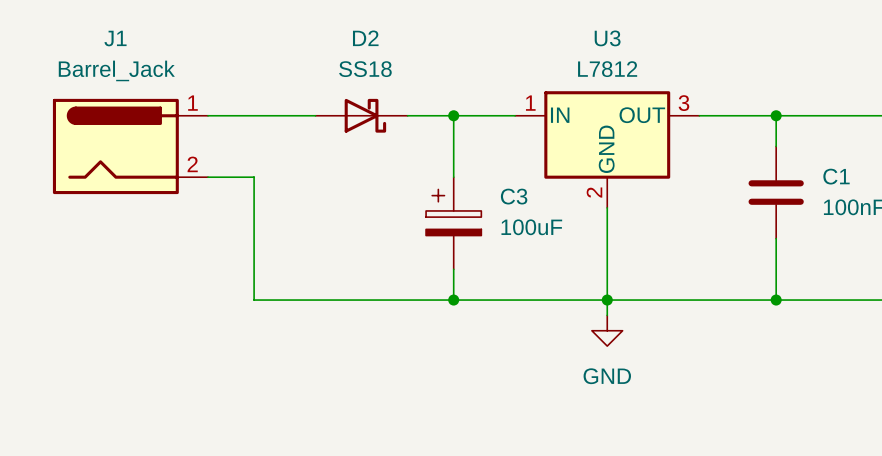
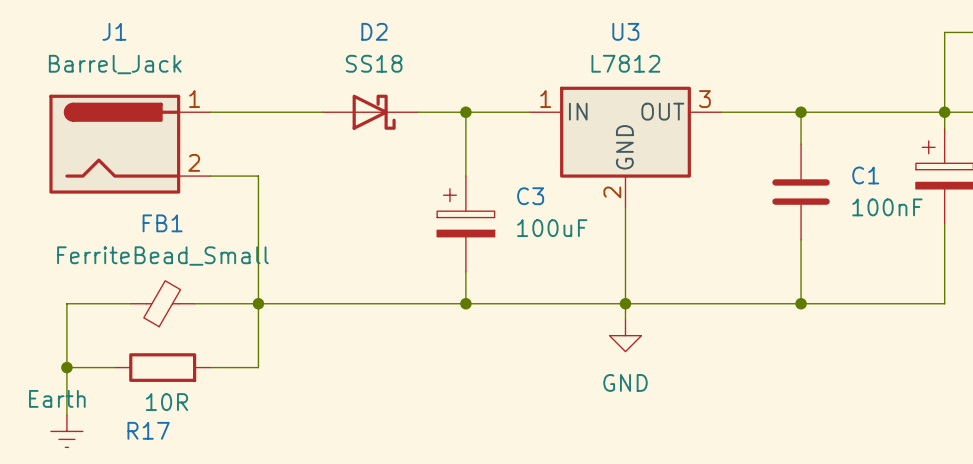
wire: none -> (130, 303) (66, 303) (66, 415)
FB1: none -> FerriteBead_Small (162, 303)
wire: none -> (194, 303) (258, 303) (258, 367) (210, 367)
junction: none -> (258, 303)
wire: none -> (66, 367) (114, 367)
junction: none -> (66, 367)
R17: none -> 10R (162, 367)
power symbol: none -> Earth (66, 431)

